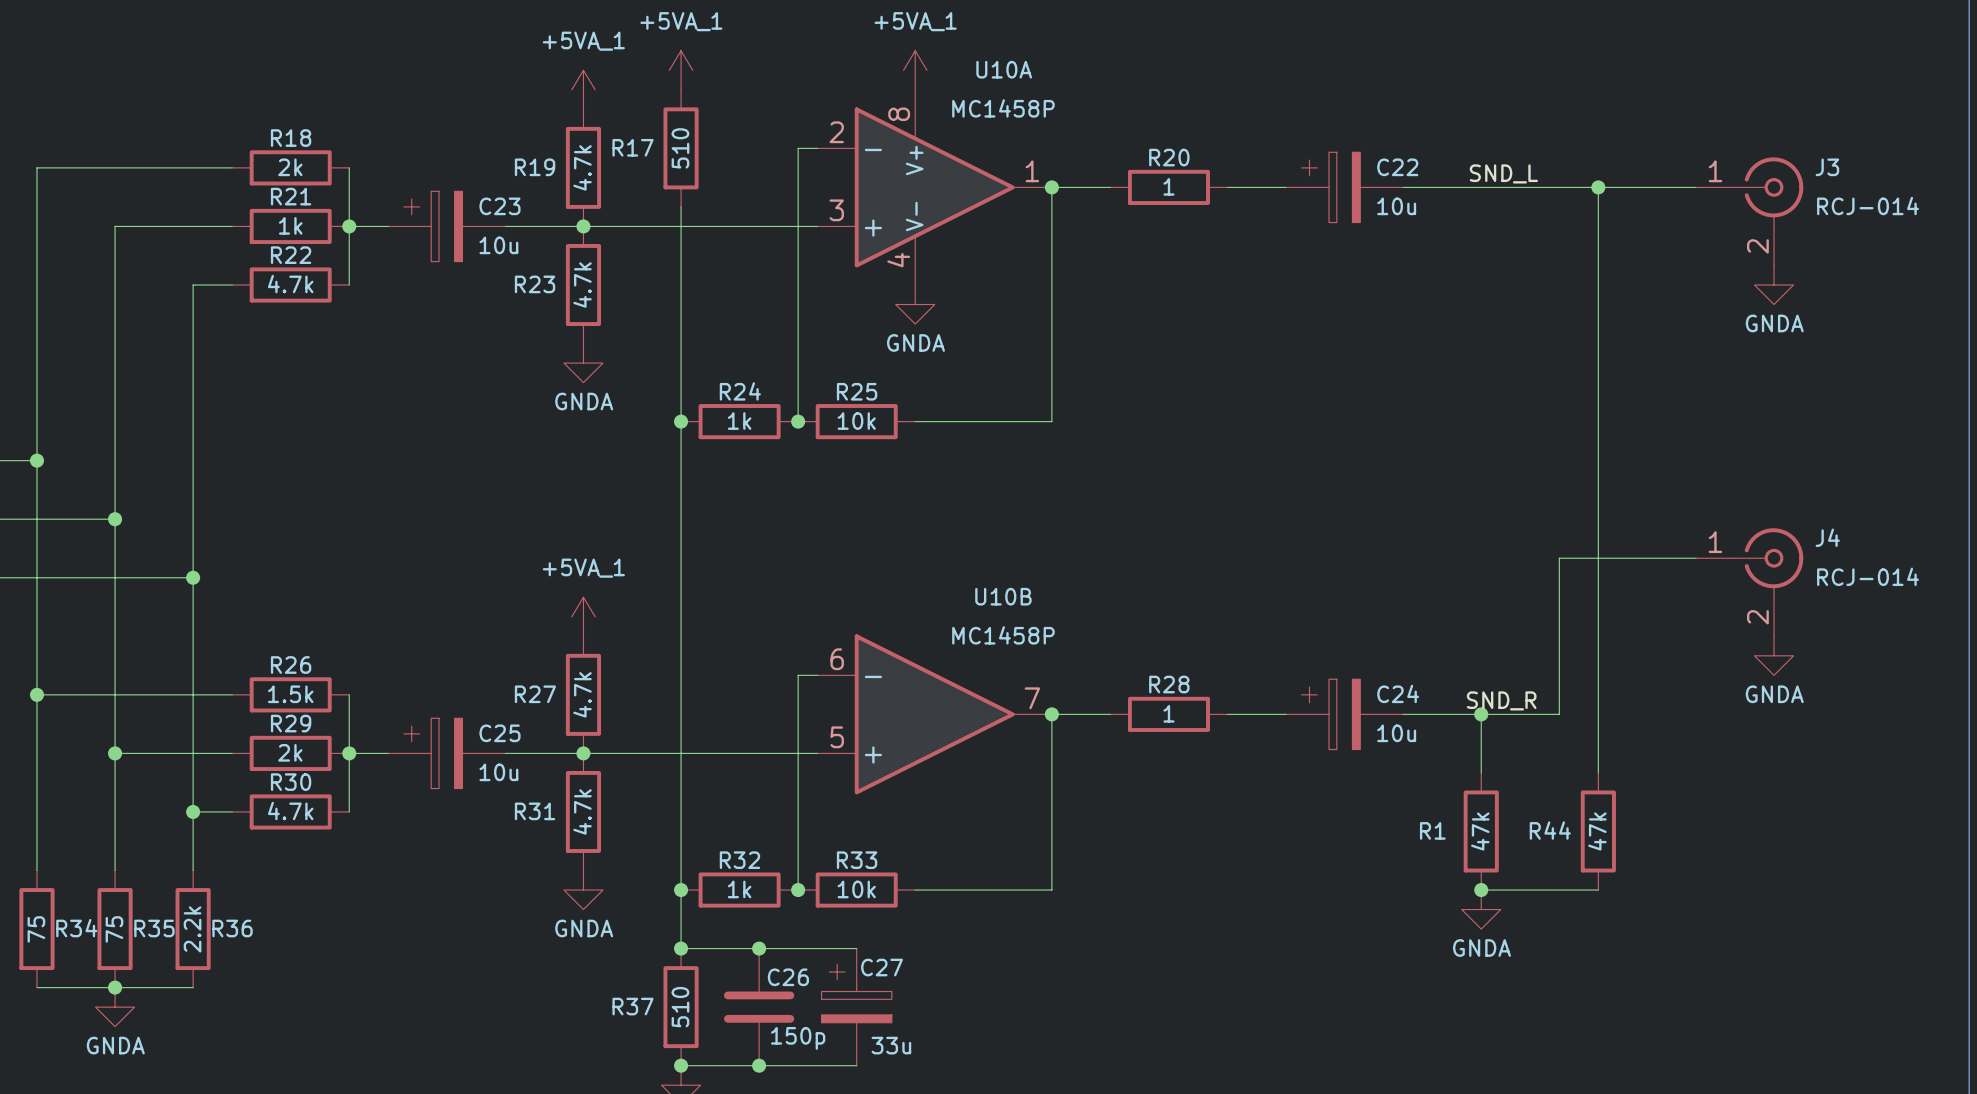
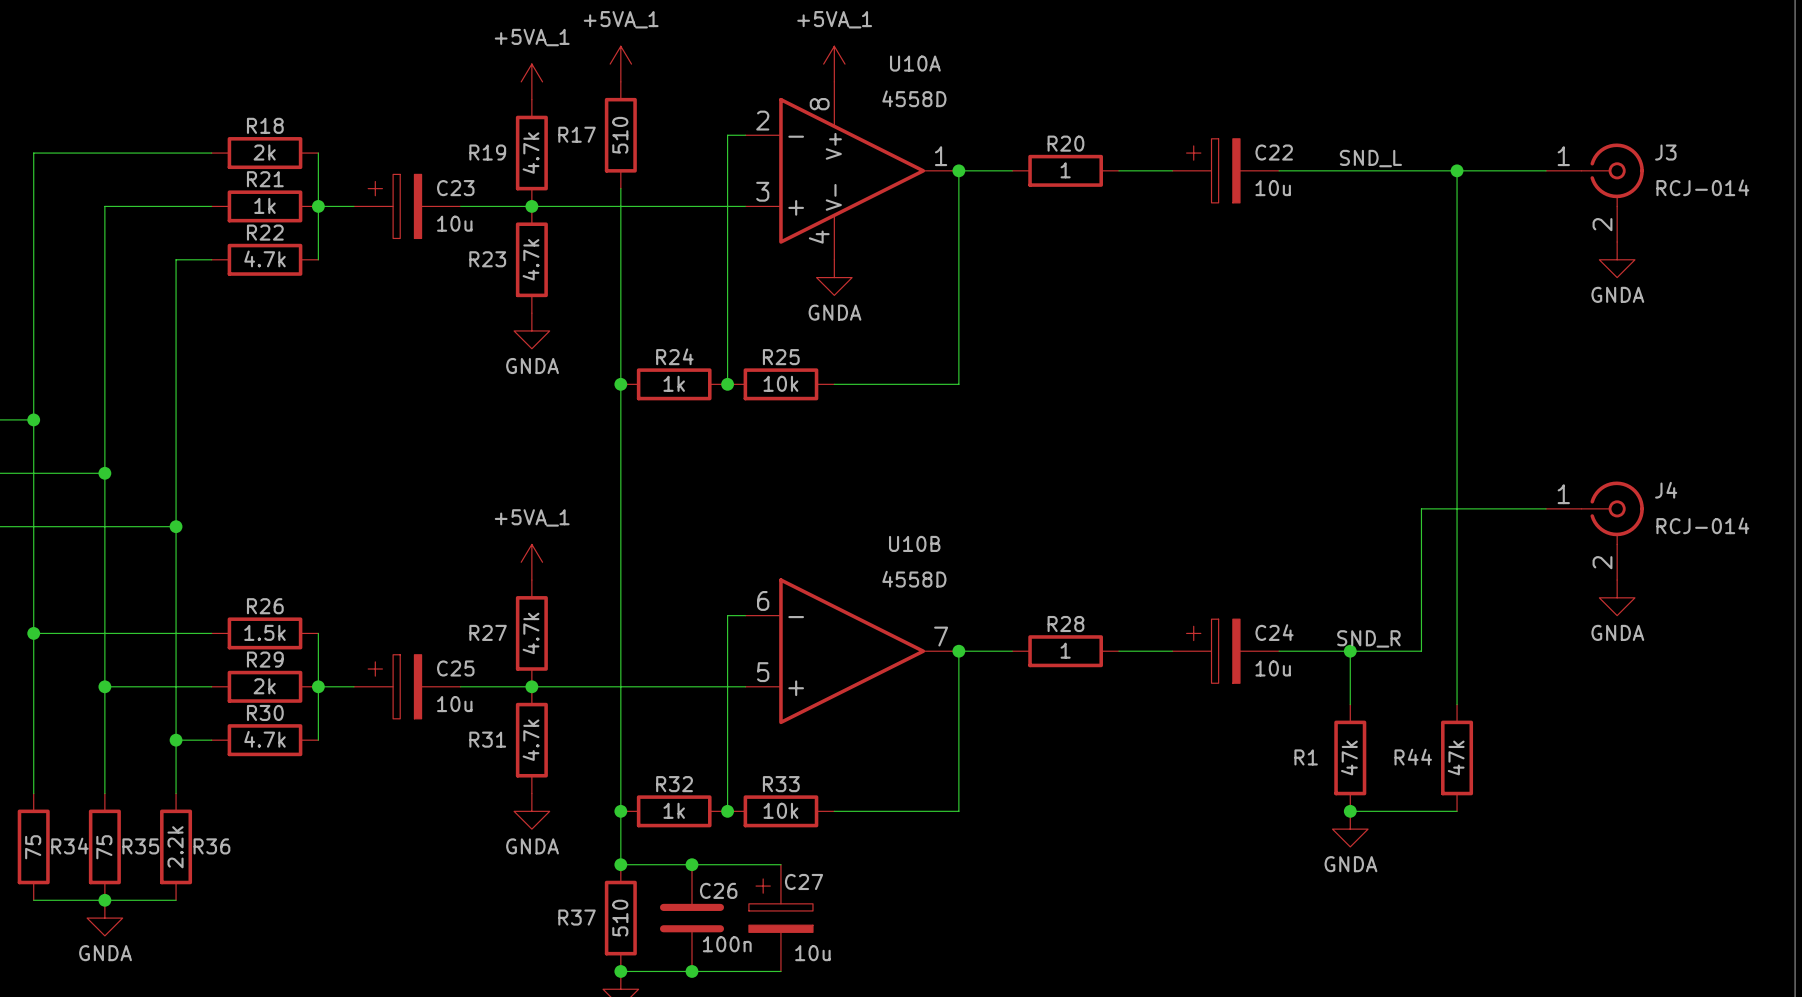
U10A value: MC1458P (1003, 108) -> 4558D (914, 98)
U10B value: MC1458P (1003, 635) -> 4558D (914, 579)
C26 value: 150p (798, 1038) -> 100n (727, 944)
C27 value: 33u (891, 1045) -> 10u (812, 953)

